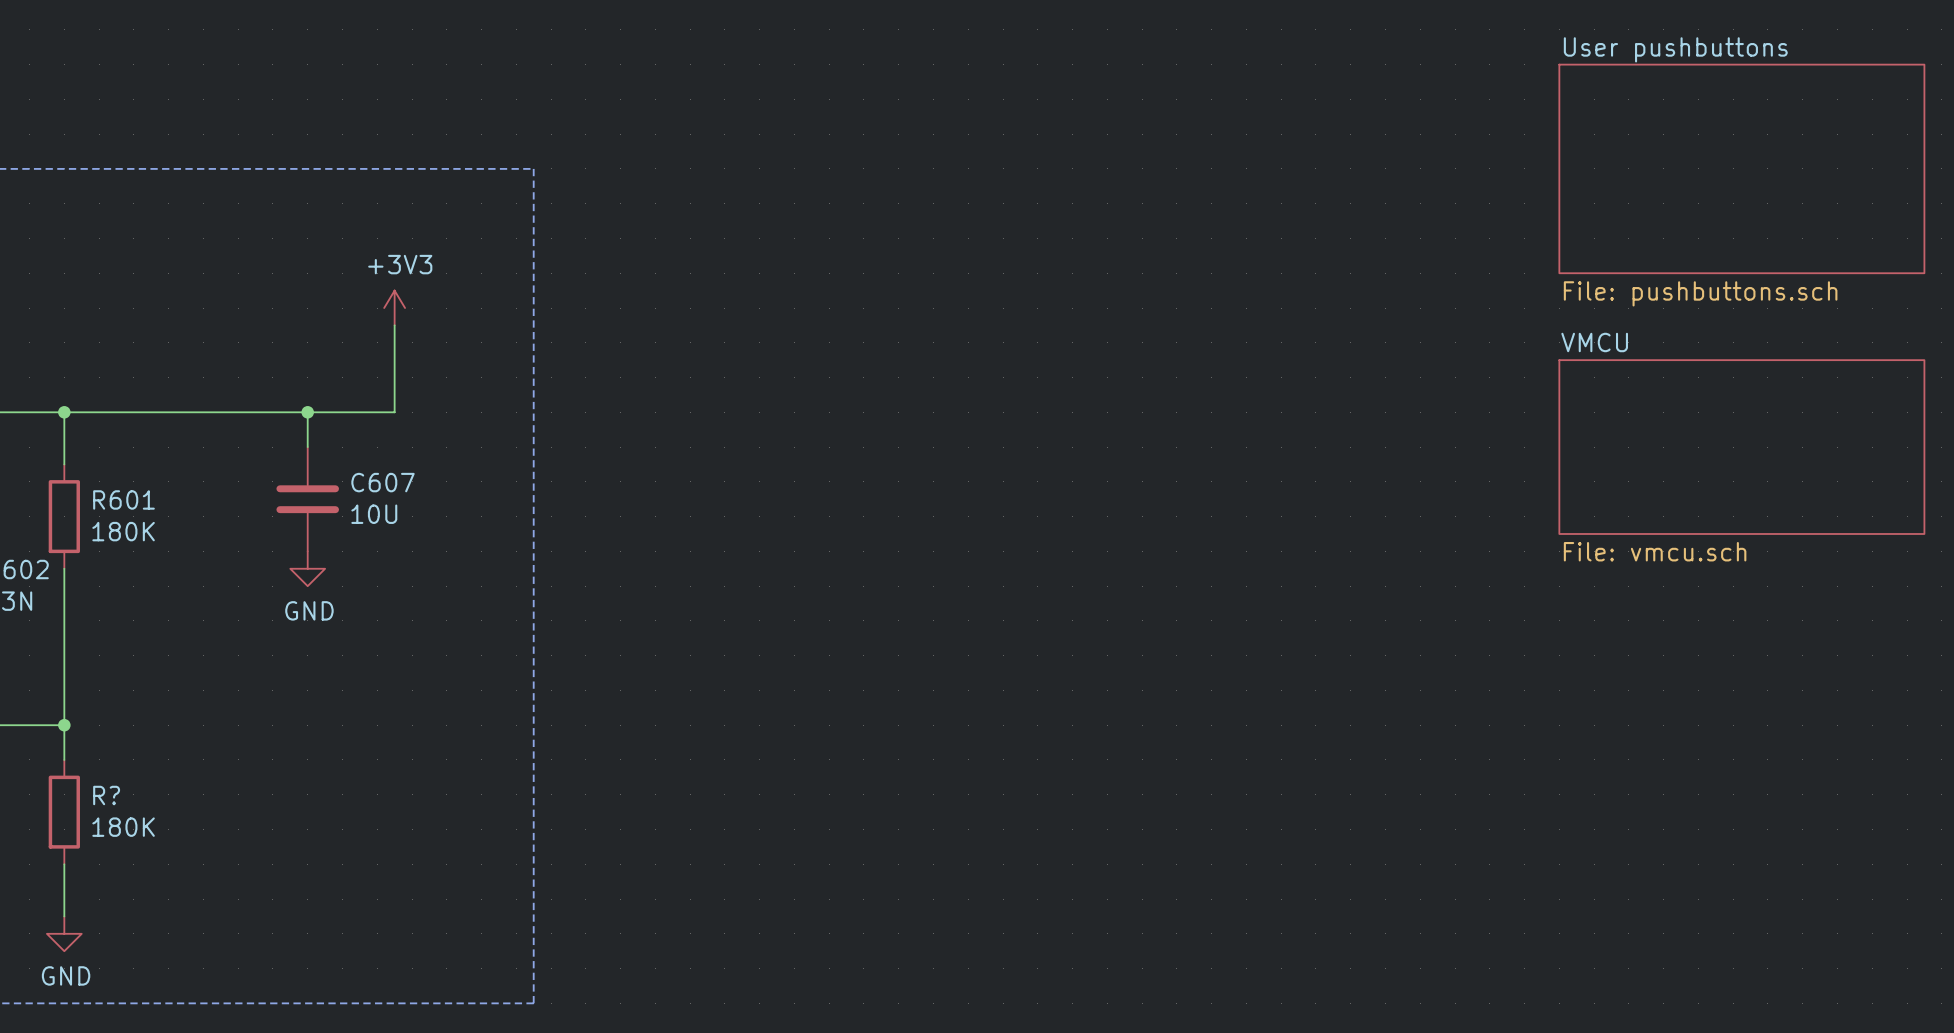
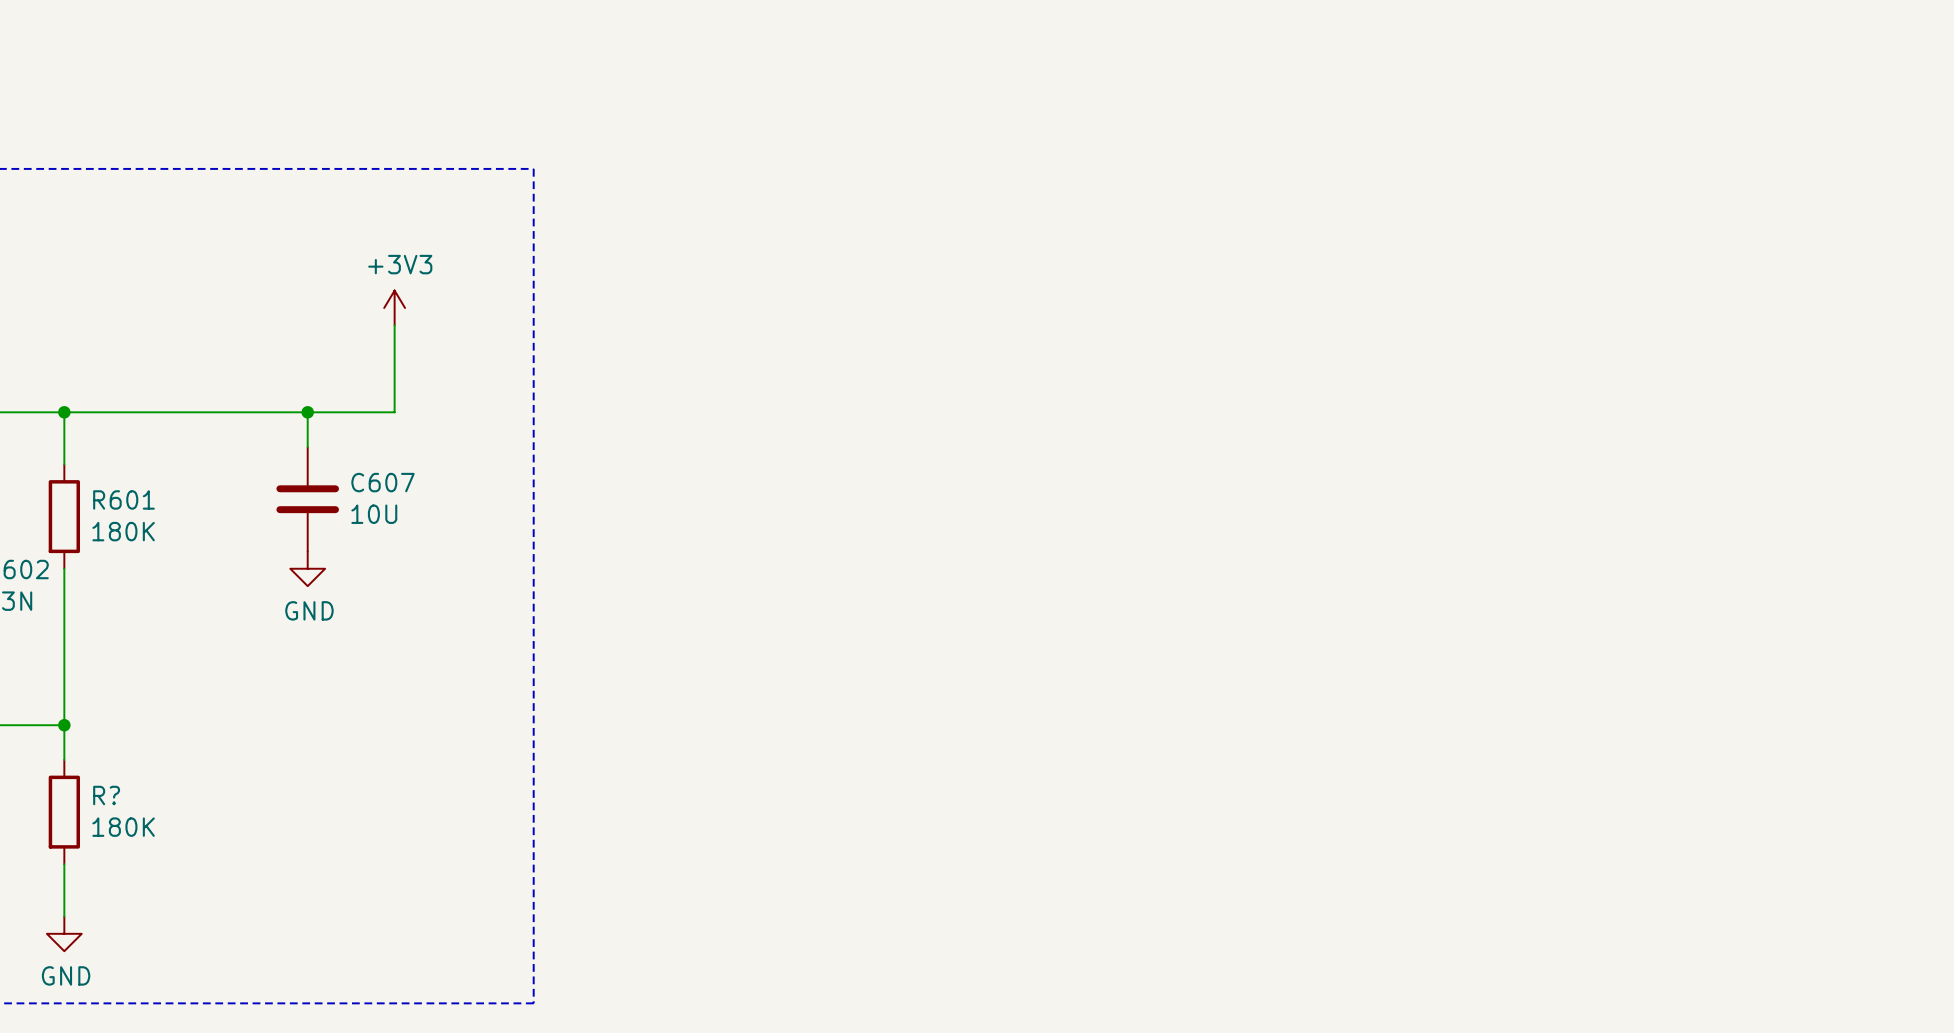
sheet User pushbuttons: File: pushbuttons.sch (1741, 168) -> none
sheet VMCU: File: vmcu.sch (1741, 447) -> none

